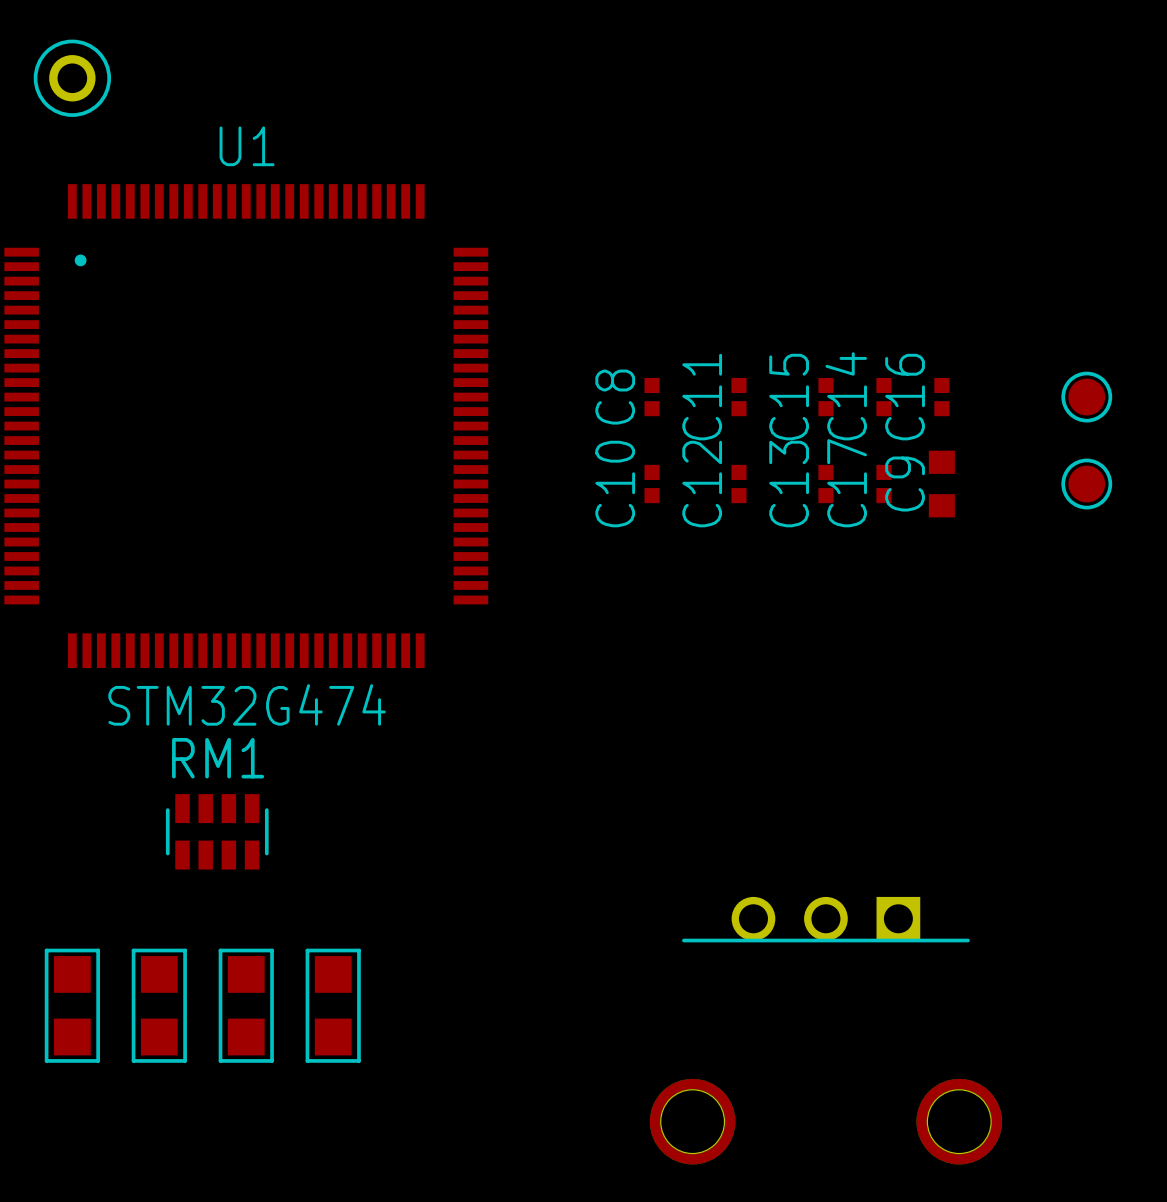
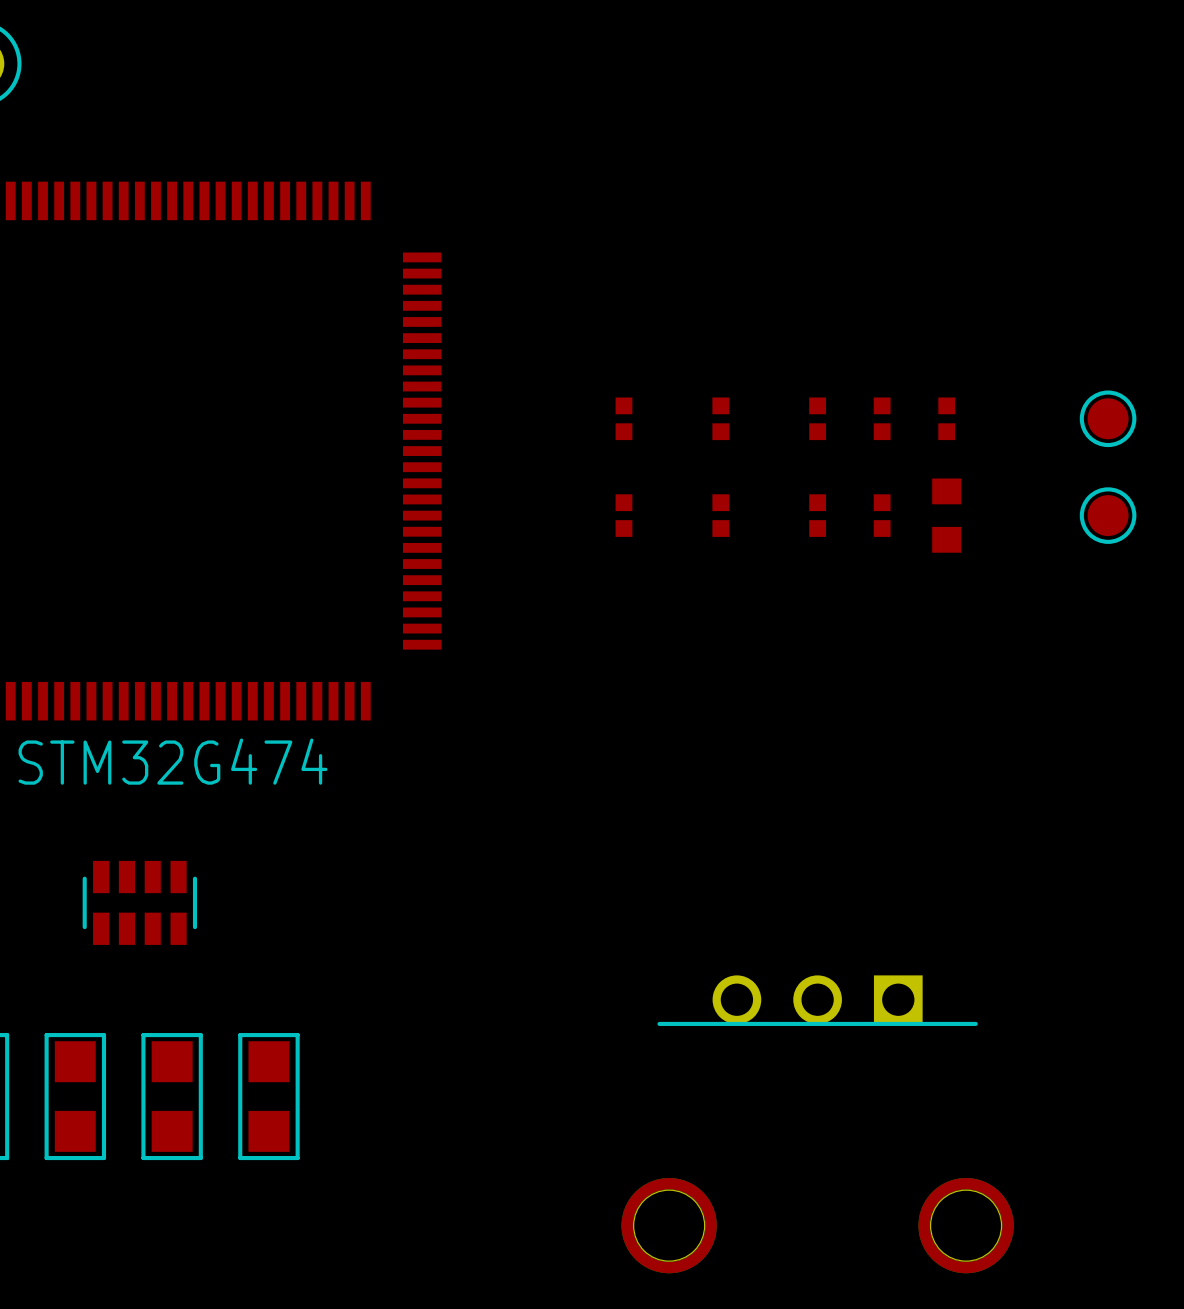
U1 name: U1 (247, 146) -> none
C14 name: C14 (846, 396) -> none
C8 name: C8 (615, 397) -> none
C11 name: C11 (702, 397) -> none
C15 name: C15 (789, 397) -> none
C16 name: C16 (905, 397) -> none
C17 name: C17 (847, 483) -> none
C10 name: C10 (615, 484) -> none
C12 name: C12 (702, 484) -> none
C13 name: C13 (789, 484) -> none
C9 name: C9 (905, 484) -> none
RM1 name: RM1 (218, 758) -> none

